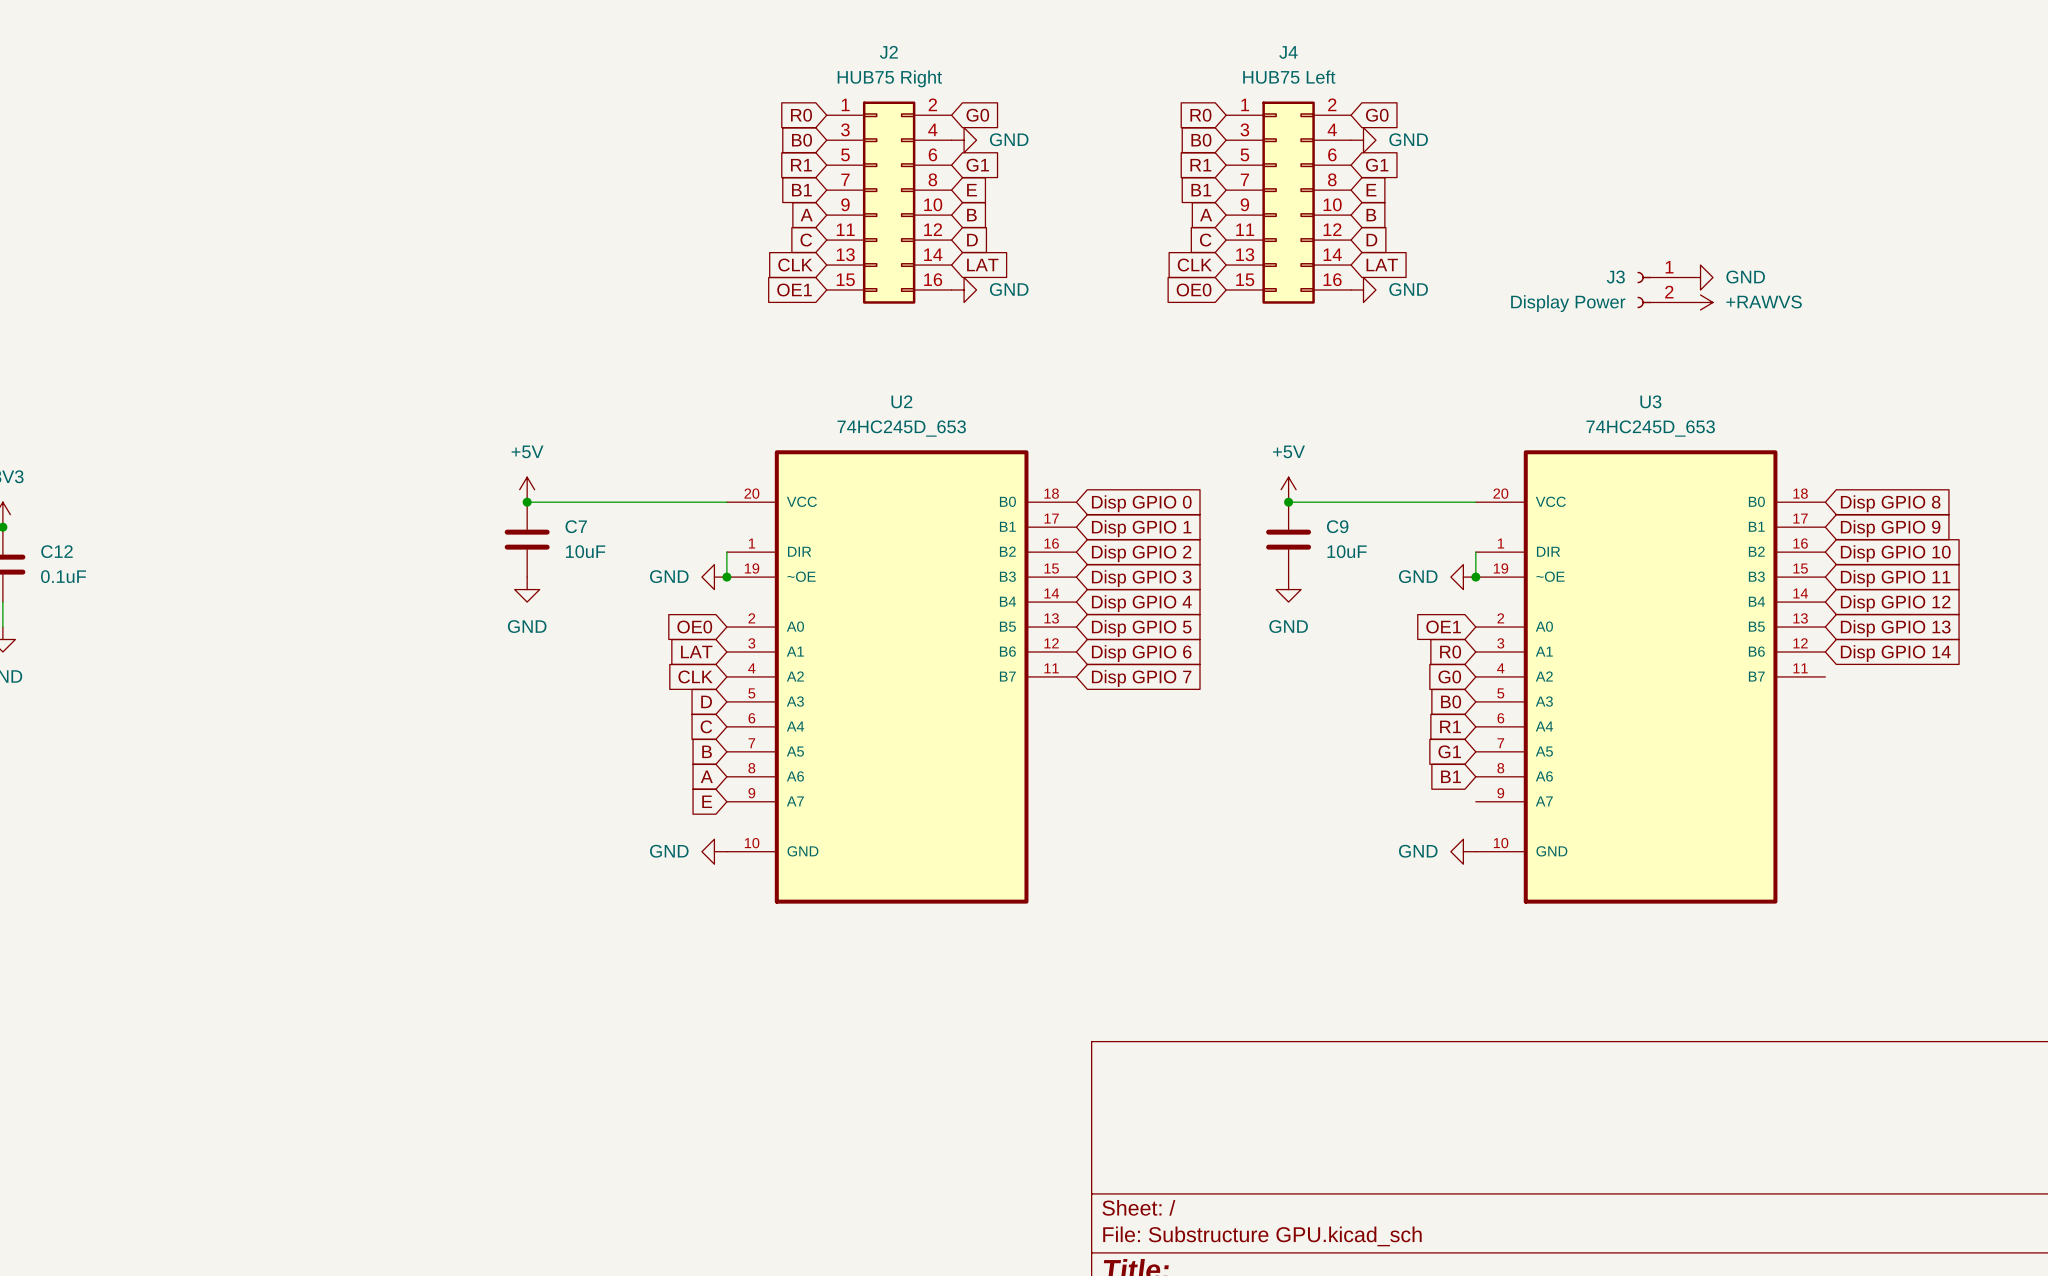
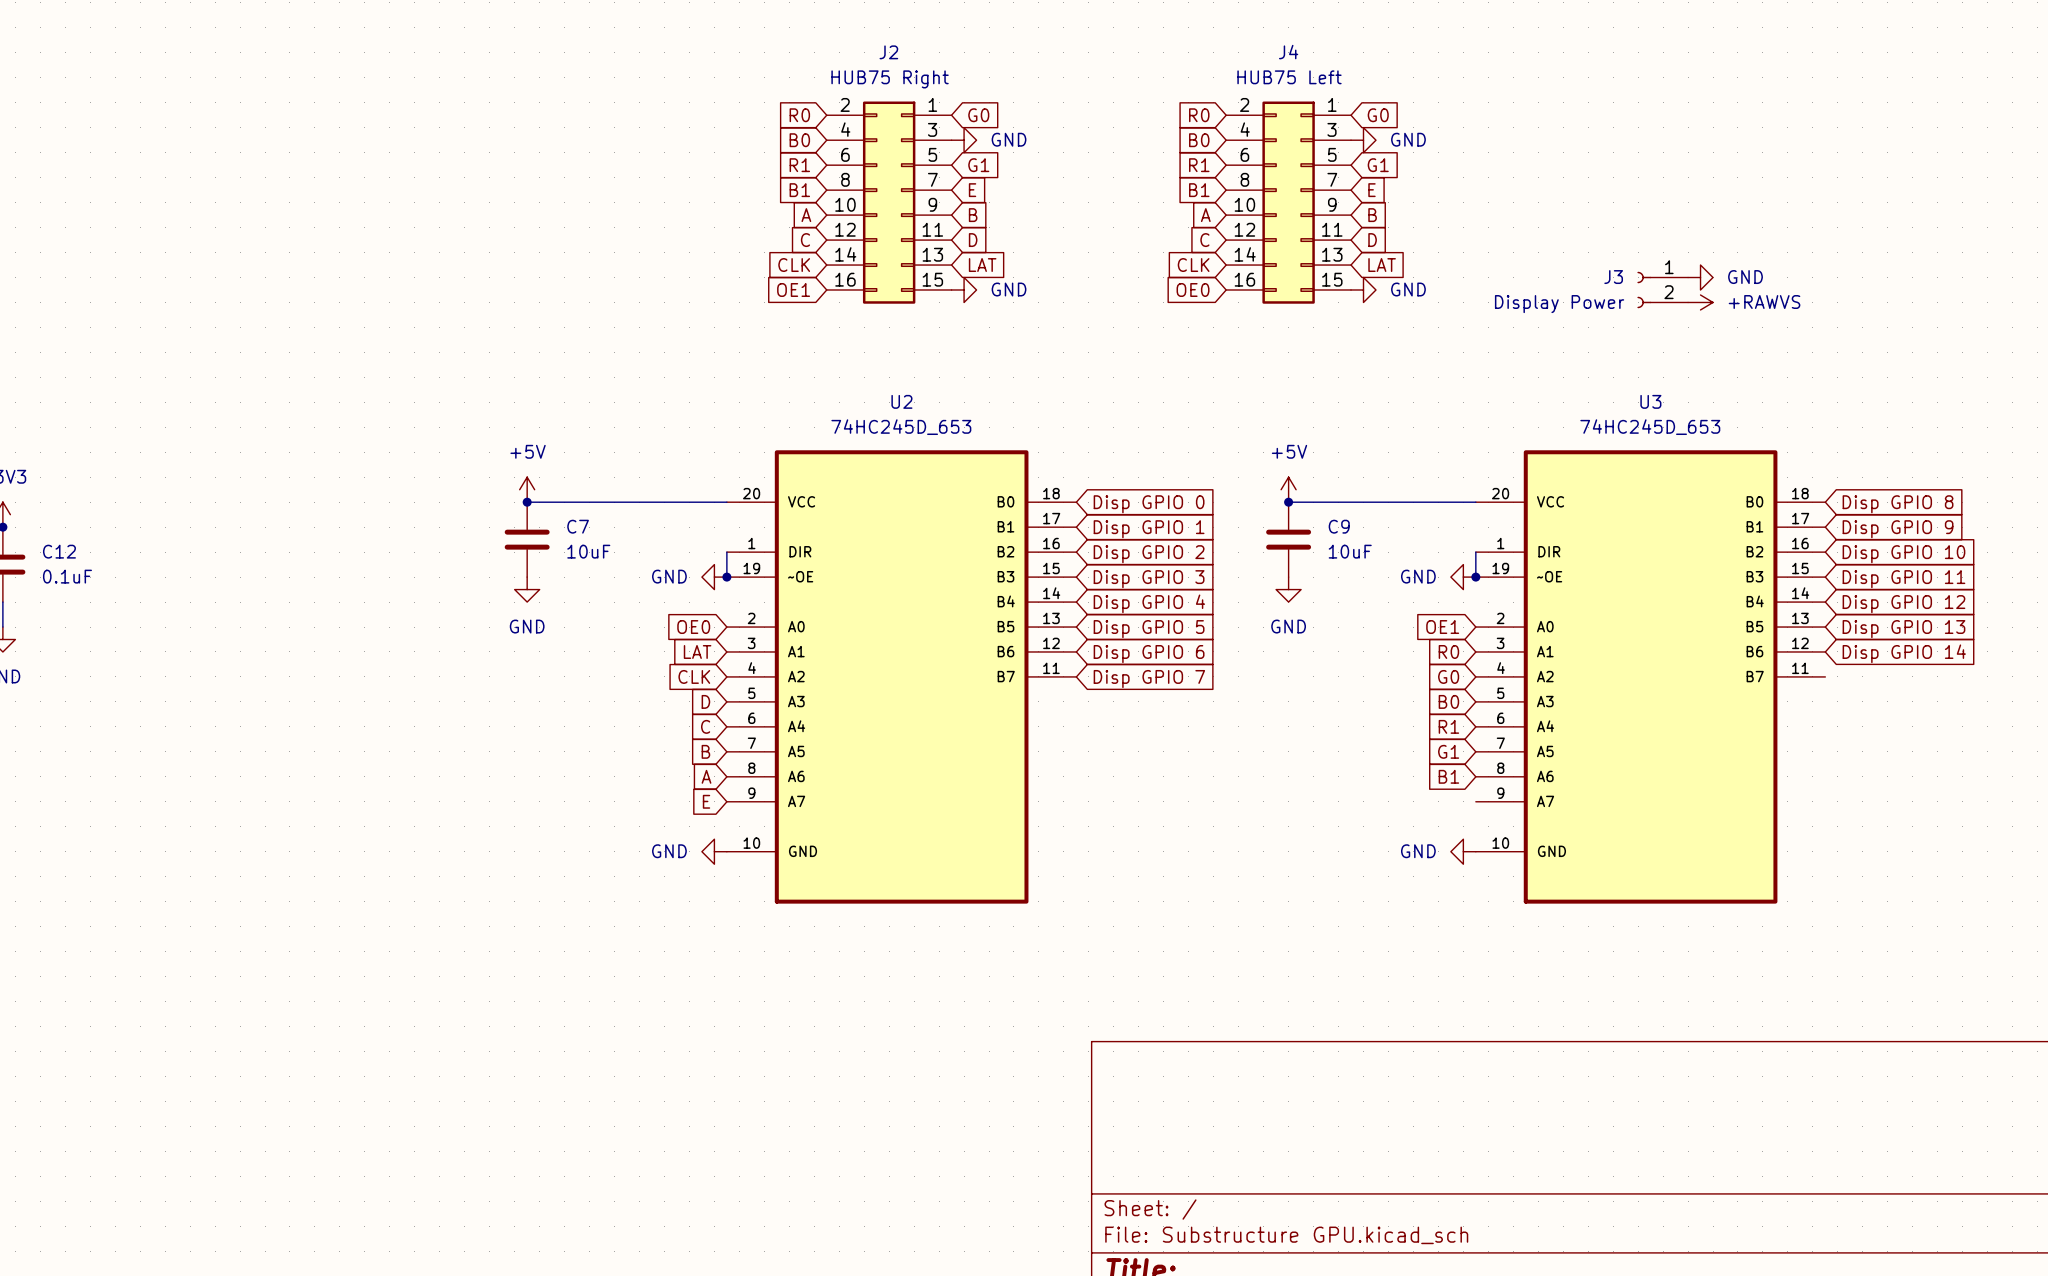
J2 flip: as is (889, 202) -> left-right (889, 202)
J4 flip: as is (1288, 202) -> left-right (1288, 202)

